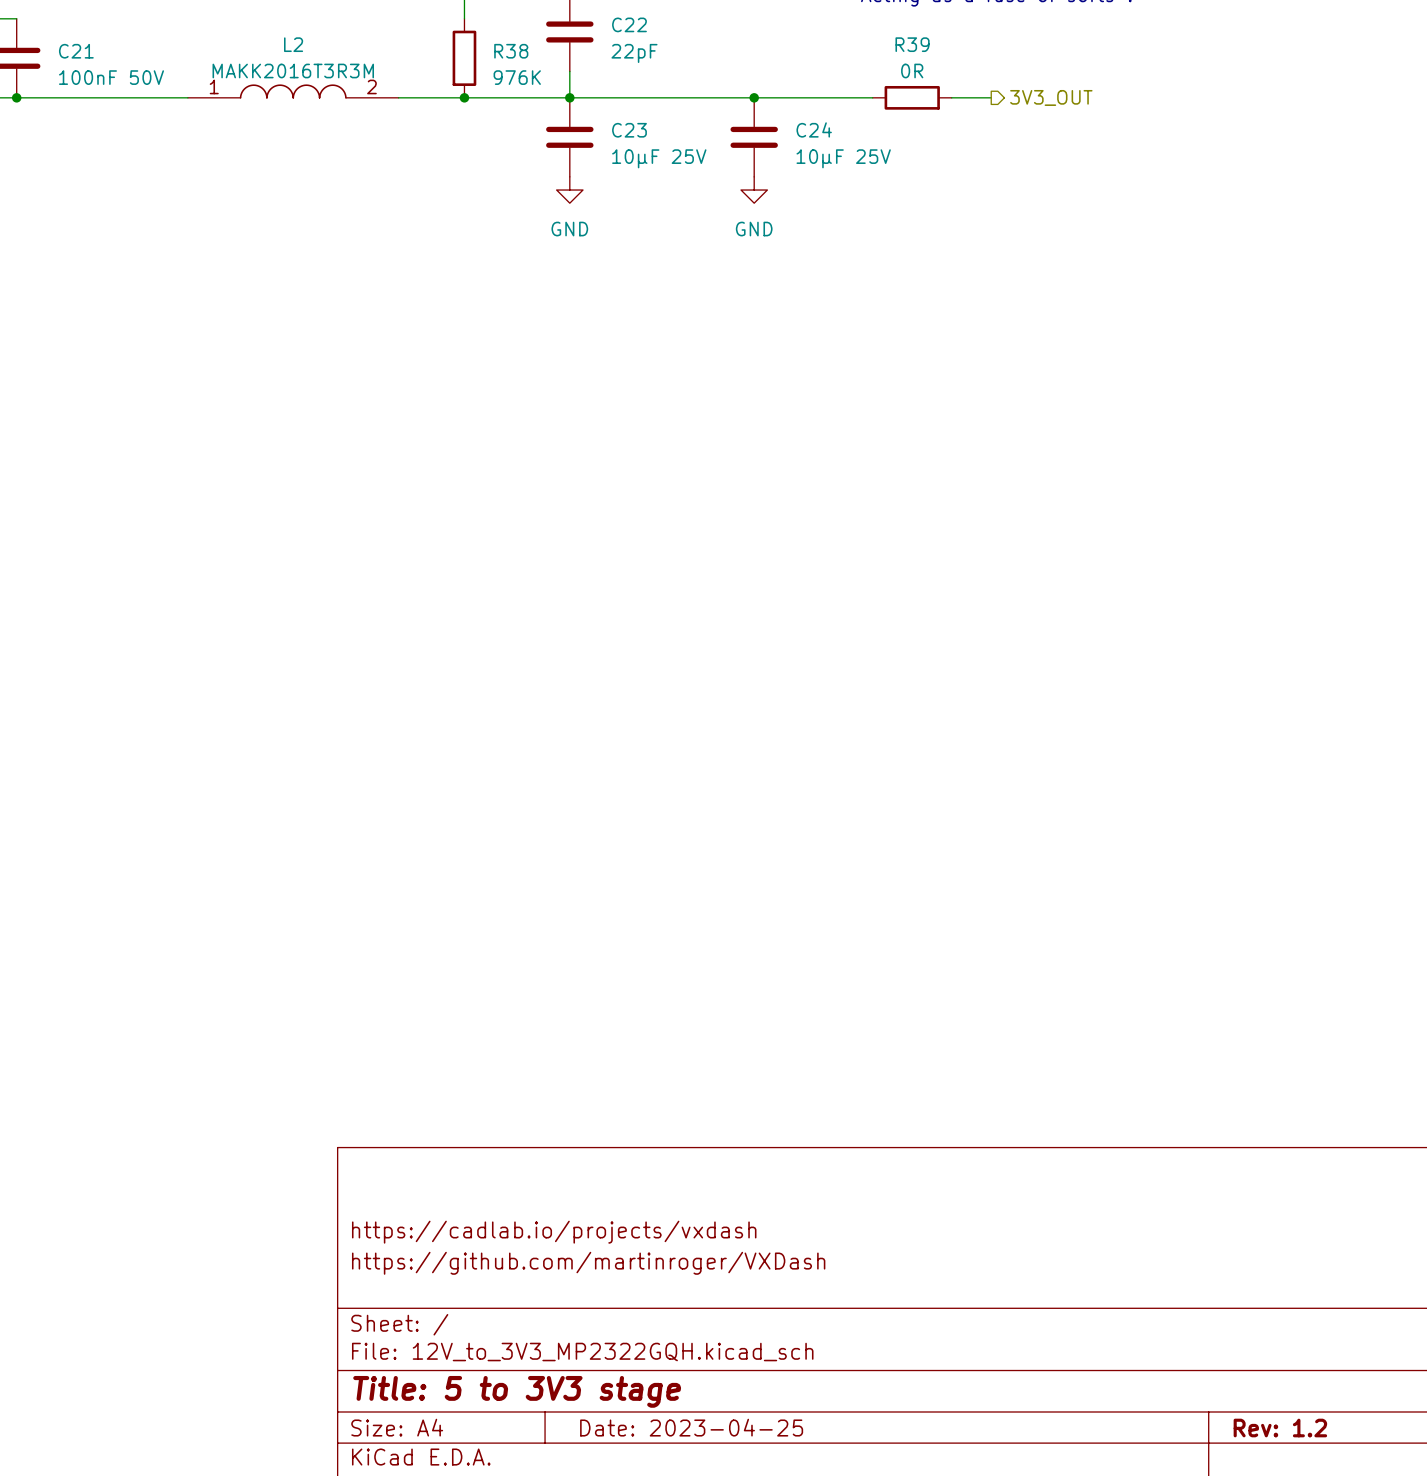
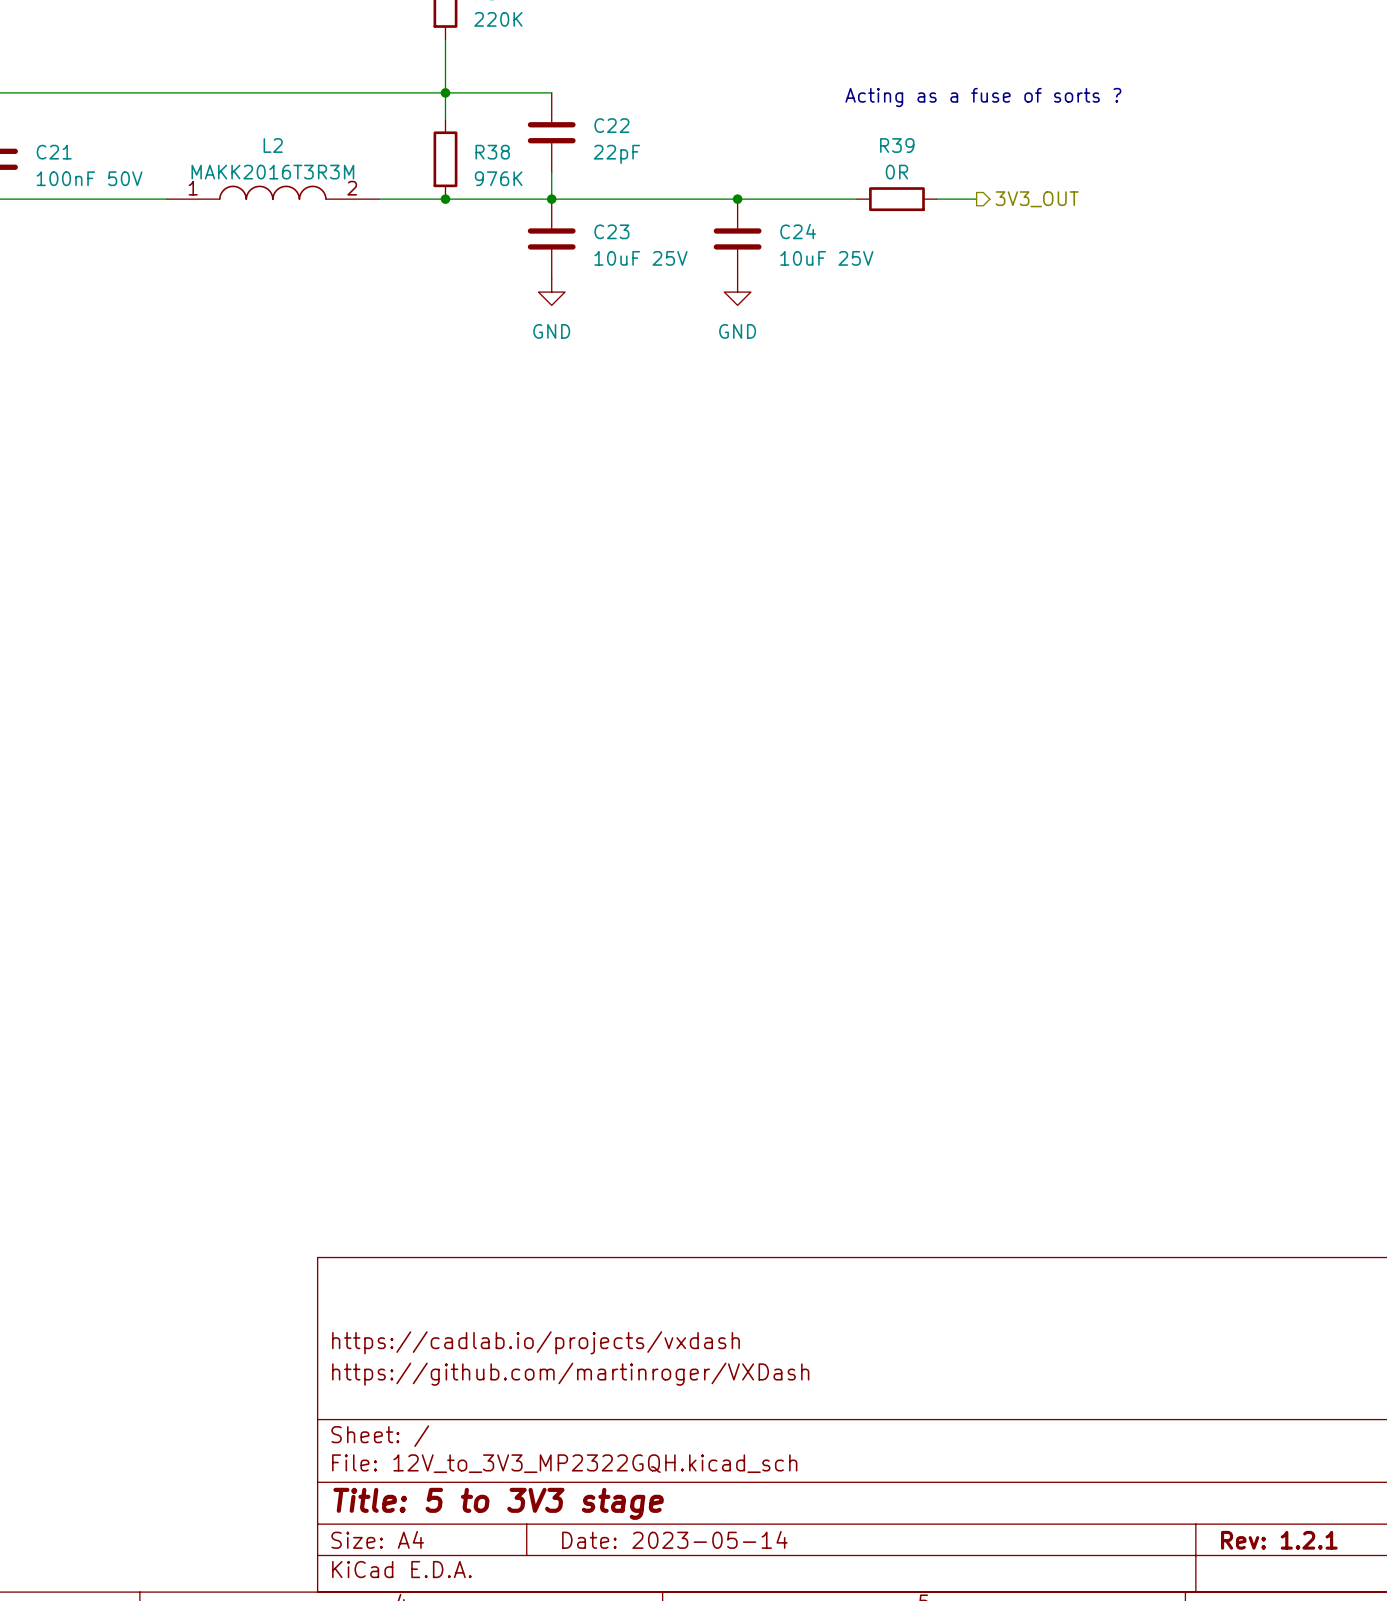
C23 value: 10µF 25V (659, 158) -> 10uF 25V (640, 258)
C24 value: 10µF 25V (843, 158) -> 10uF 25V (826, 258)
title block: Date: 2023-04-25 (691, 1427) -> Date: 2023-05-14 (674, 1539)
title block: Rev: 1.2 (1280, 1428) -> Rev: 1.2.1 (1279, 1540)

